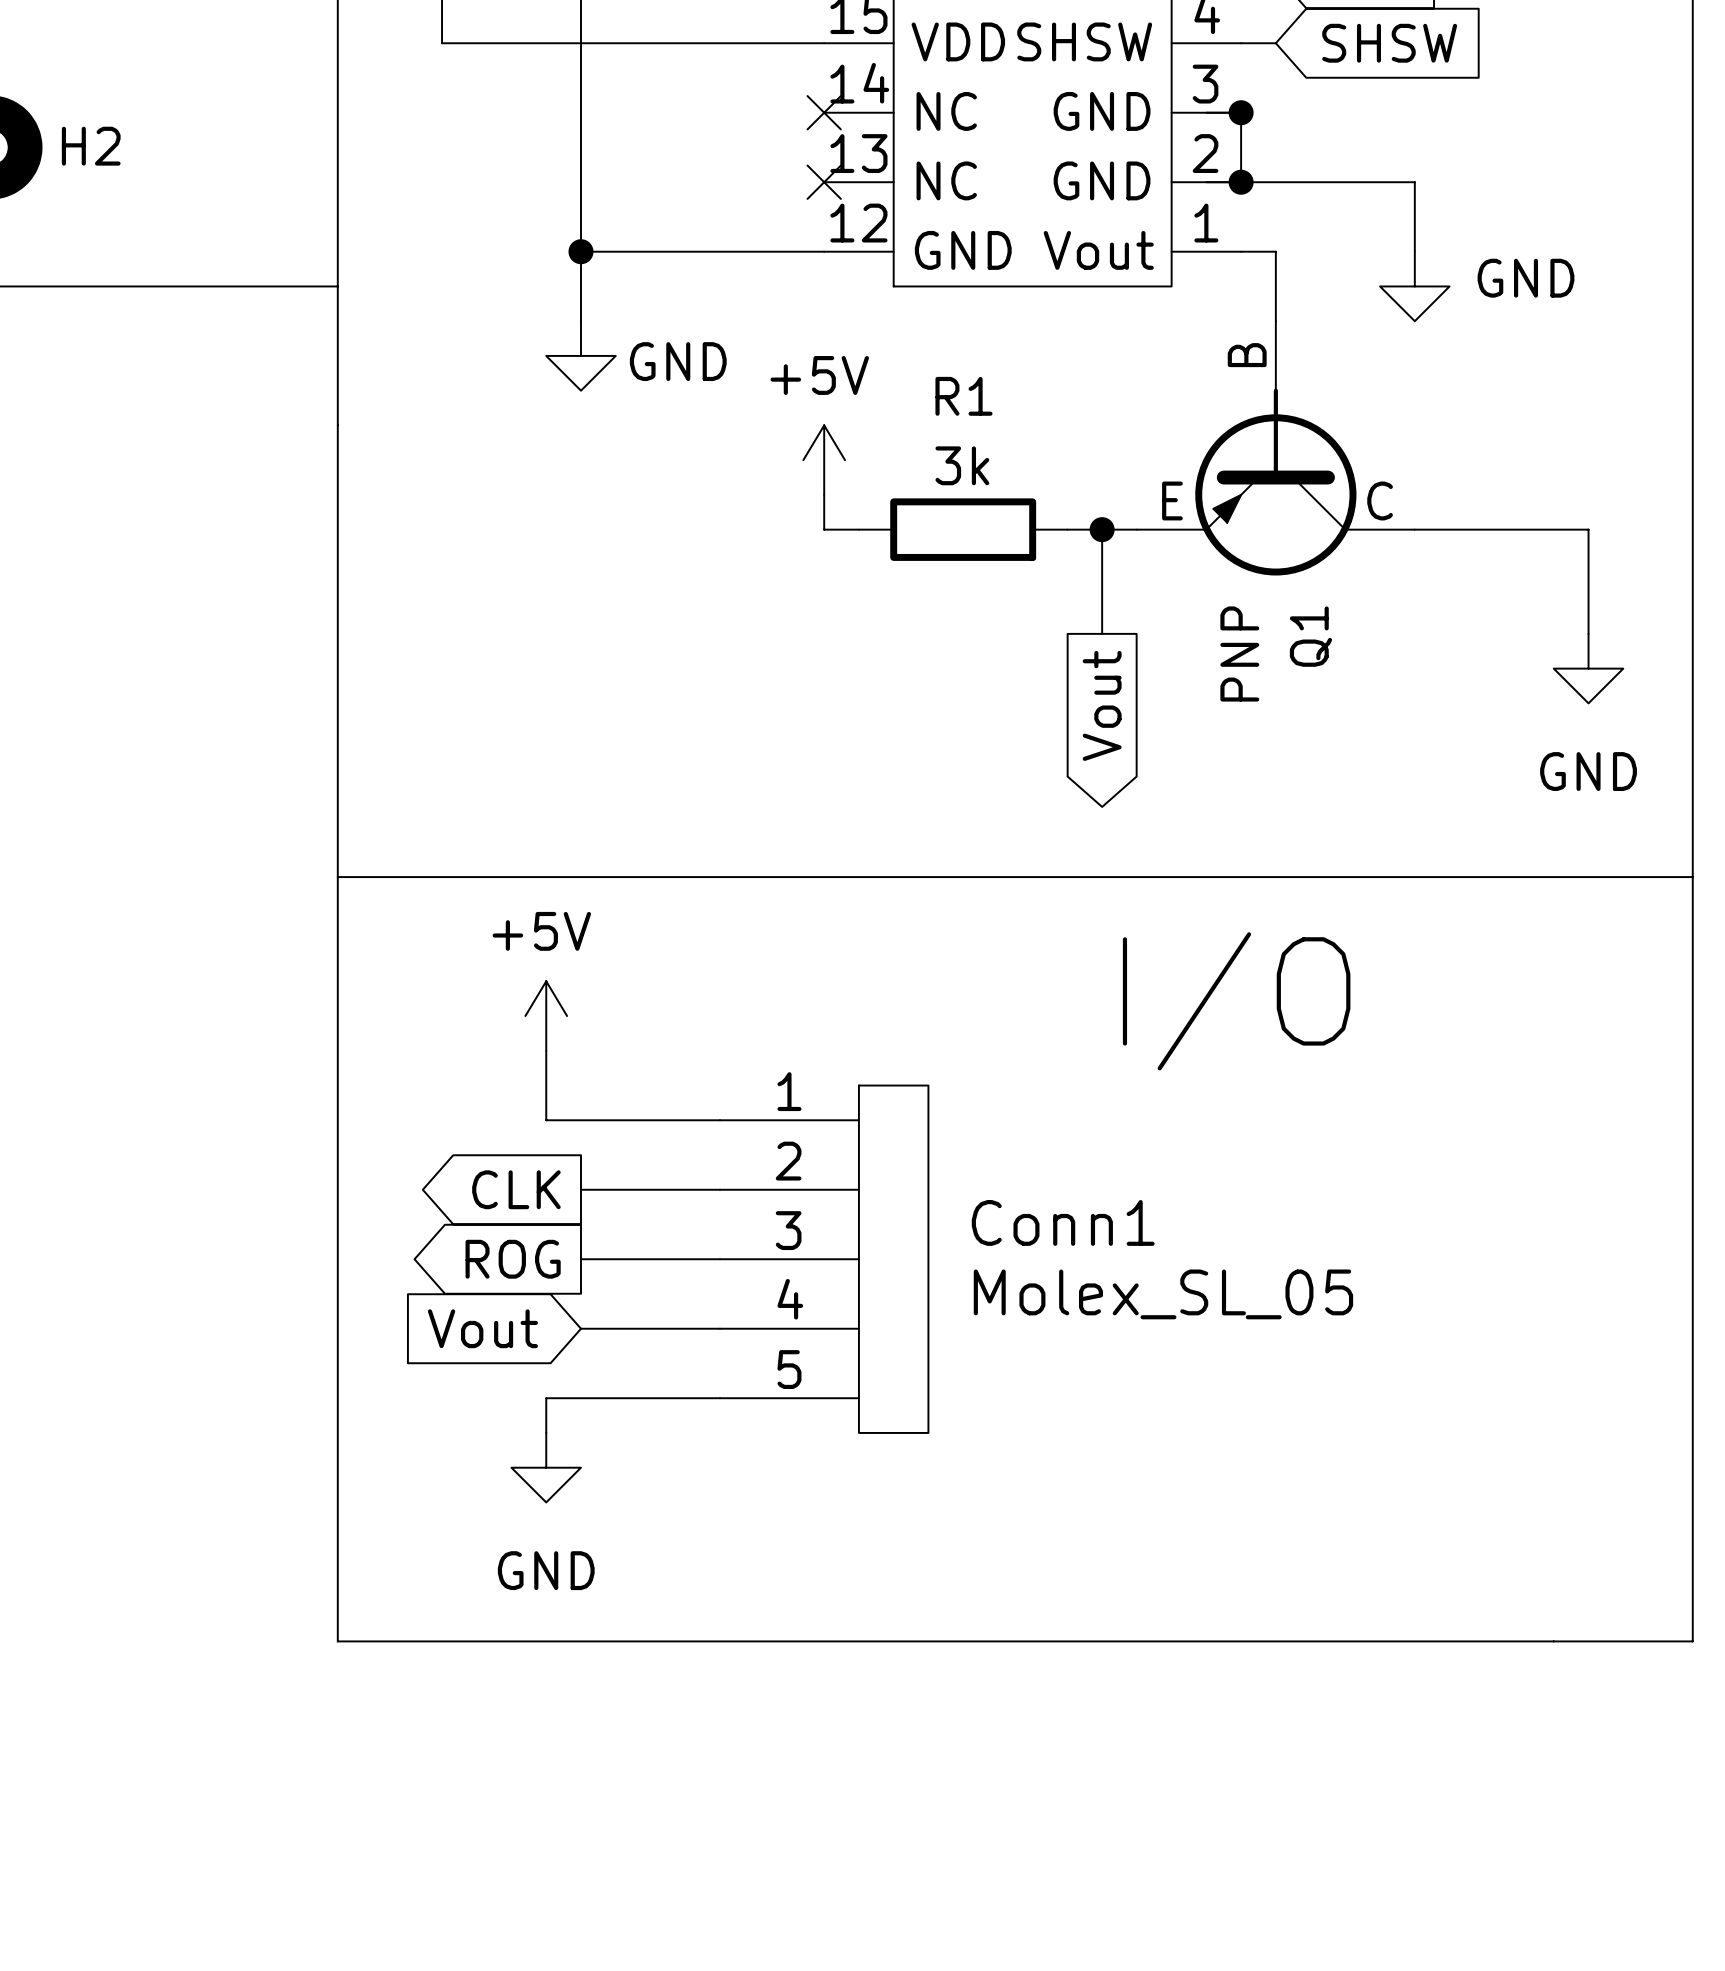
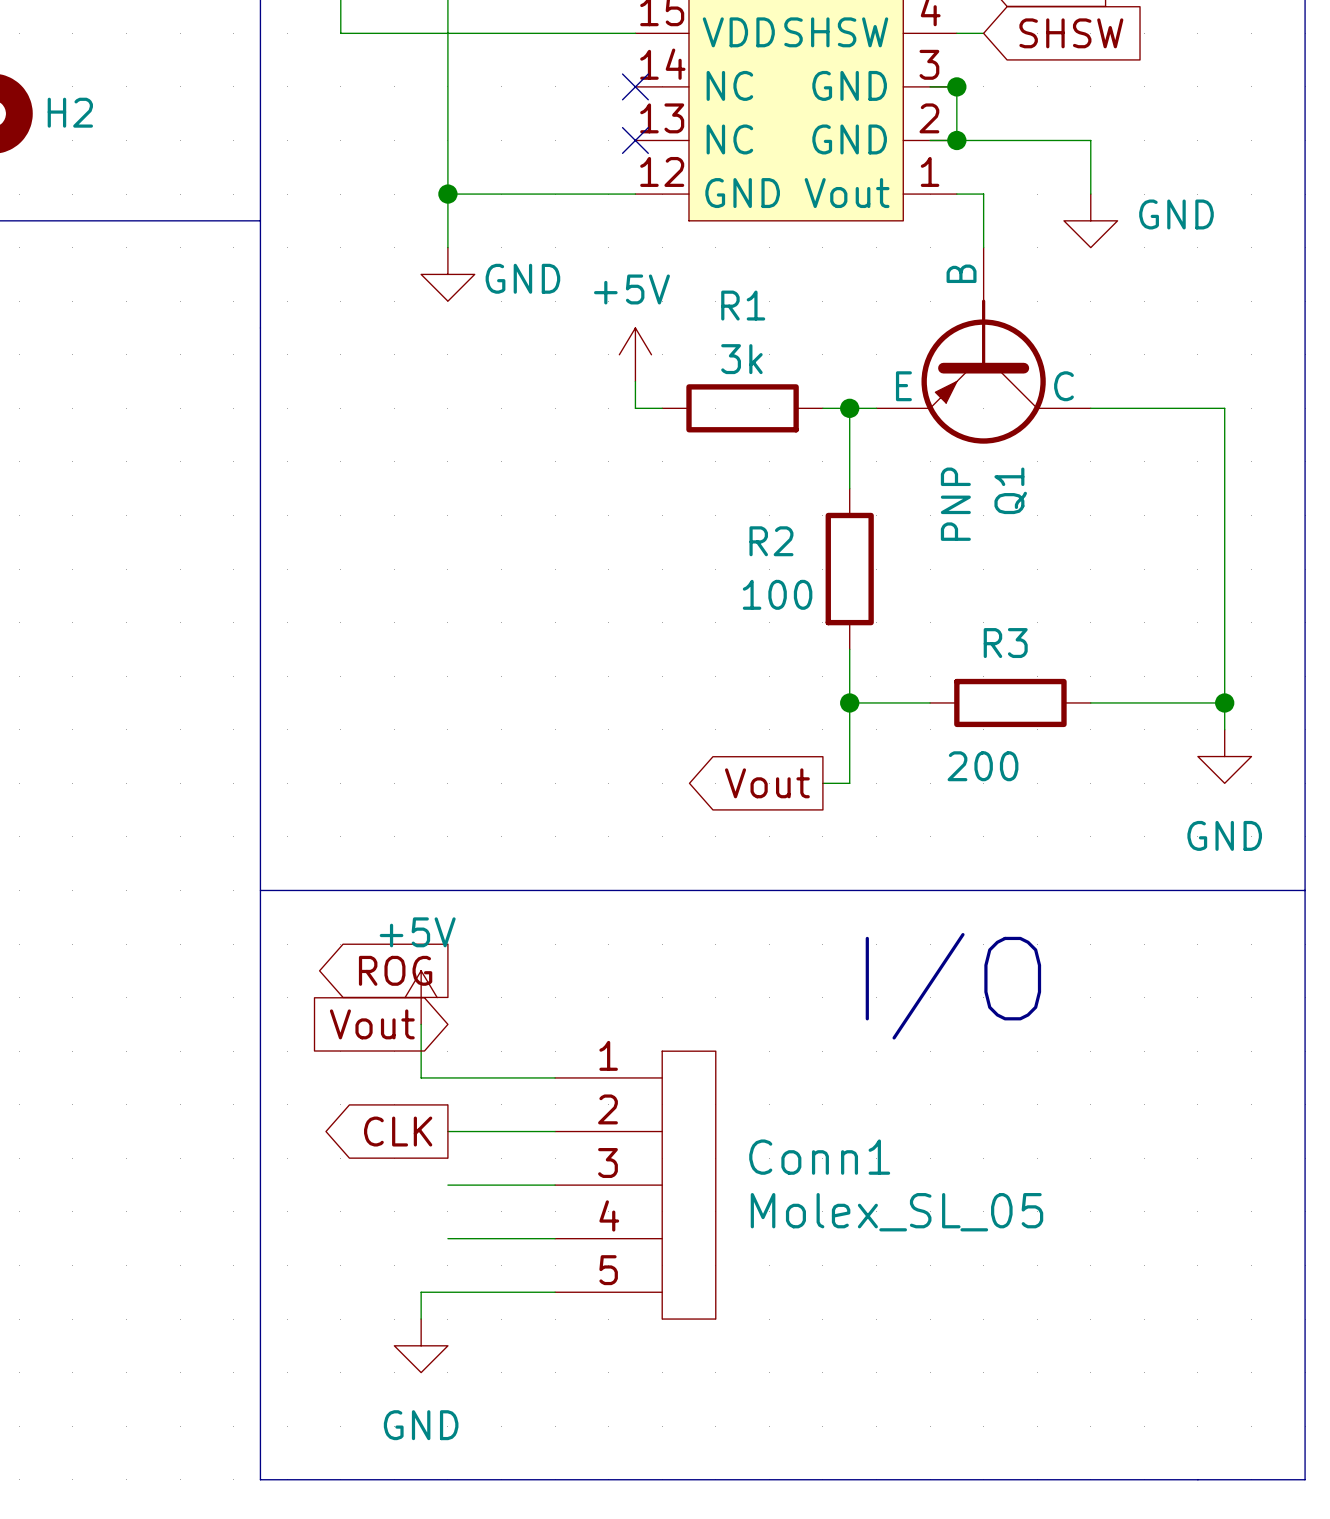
wire: none -> (1224, 488) (1224, 729)
power symbol position: GND (1588, 668) -> GND (1224, 756)
global label rotation: 0° (1102, 705) -> 90° clockwise (767, 783)
global label position: Vout (1102, 705) -> Vout (767, 783)
R2: none -> 100 (849, 569)
wire: none -> (849, 649) (849, 783) (822, 783)
line: (337, 877) (1692, 877) -> (260, 890) (1305, 890)
wire: none -> (849, 702) (930, 702)
junction: none -> (849, 702)
R3: none -> 200 (1010, 702)
wire: none -> (1090, 702) (1224, 702)
junction: none -> (1224, 702)
text position: I/O (1236, 1001) -> I/O (953, 986)
power symbol position: +5V (546, 1016) -> +5V (421, 997)
wire: (546, 1050) (546, 1120) (719, 1120) -> none
global label position: CLK (516, 1189) -> CLK (398, 1131)
wire: (581, 1189) (719, 1189) -> (447, 1131) (555, 1131)
wire: (581, 1259) (719, 1259) -> (447, 1185) (555, 1185)
Conn1 position: (824, 1259) -> (635, 1185)
wire: (581, 1328) (719, 1328) -> (447, 1238) (555, 1238)
wire: (546, 1398) (546, 1432) -> (421, 1077) (421, 1024)
power symbol position: GND (546, 1467) -> GND (421, 1345)
line: (337, 1641) (1692, 1641) -> (260, 1265) (260, 1479) (1305, 1479) (1305, 1265)
wire: none -> (555, 1292) (421, 1292) (421, 1319)

